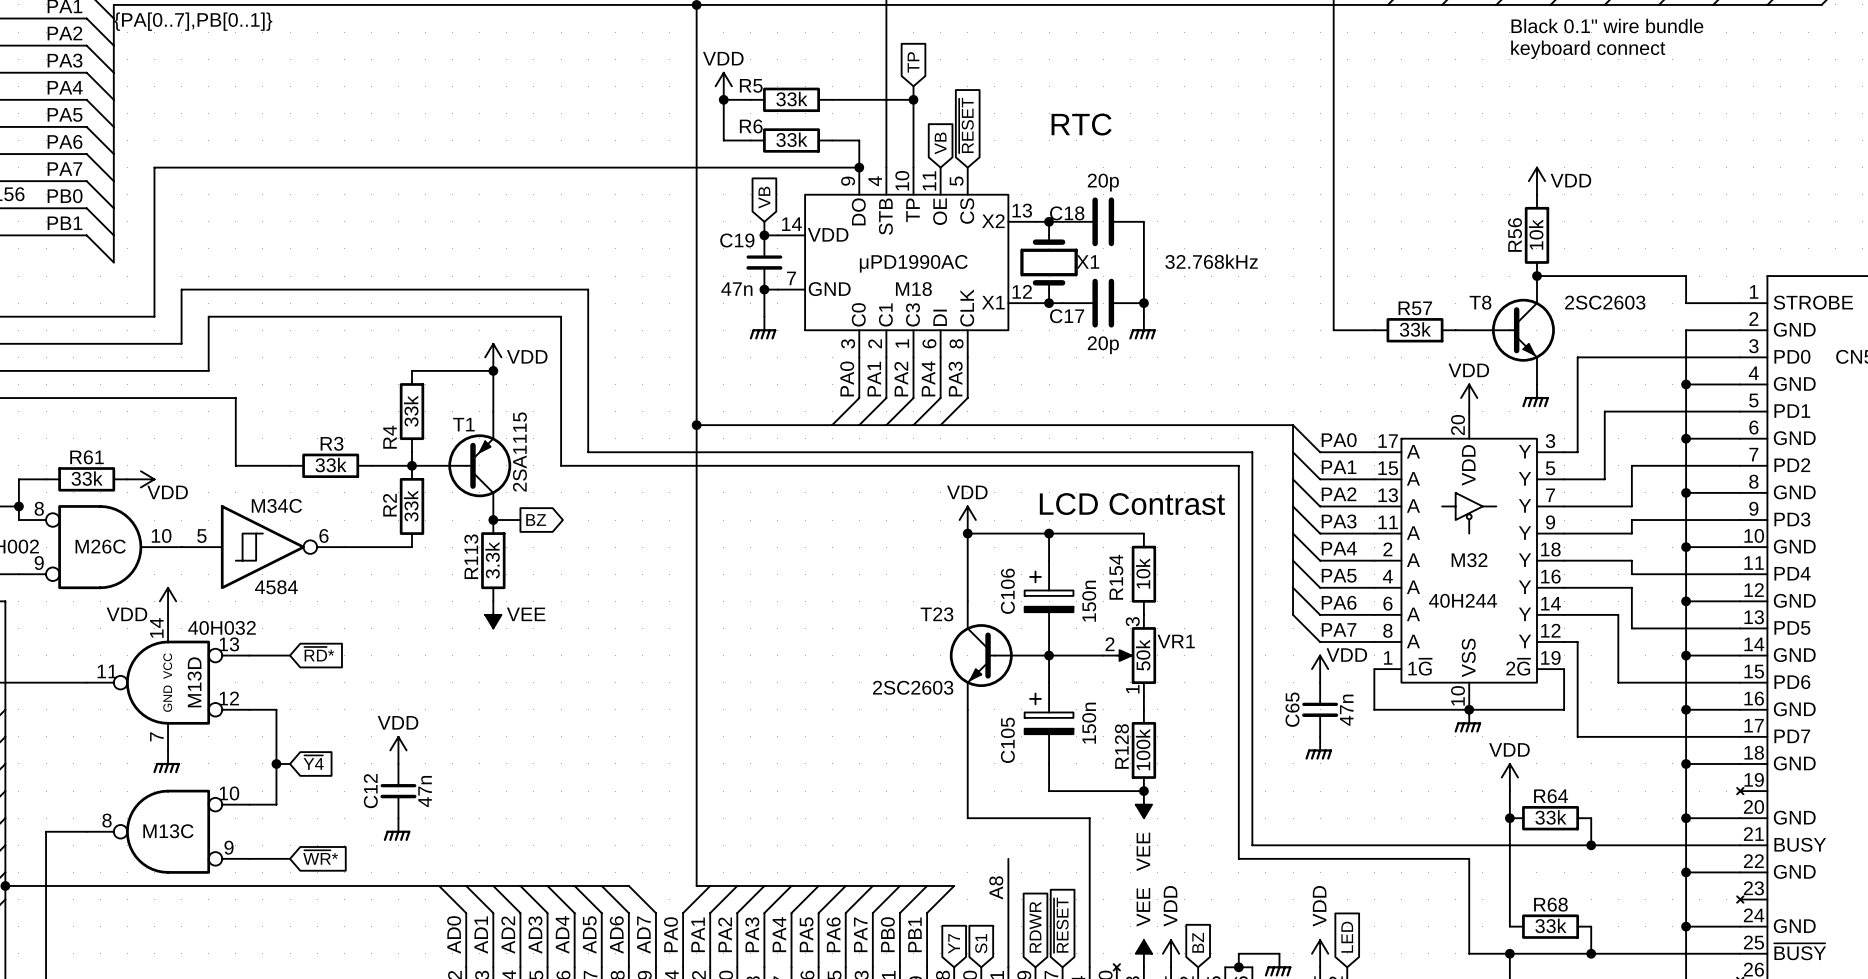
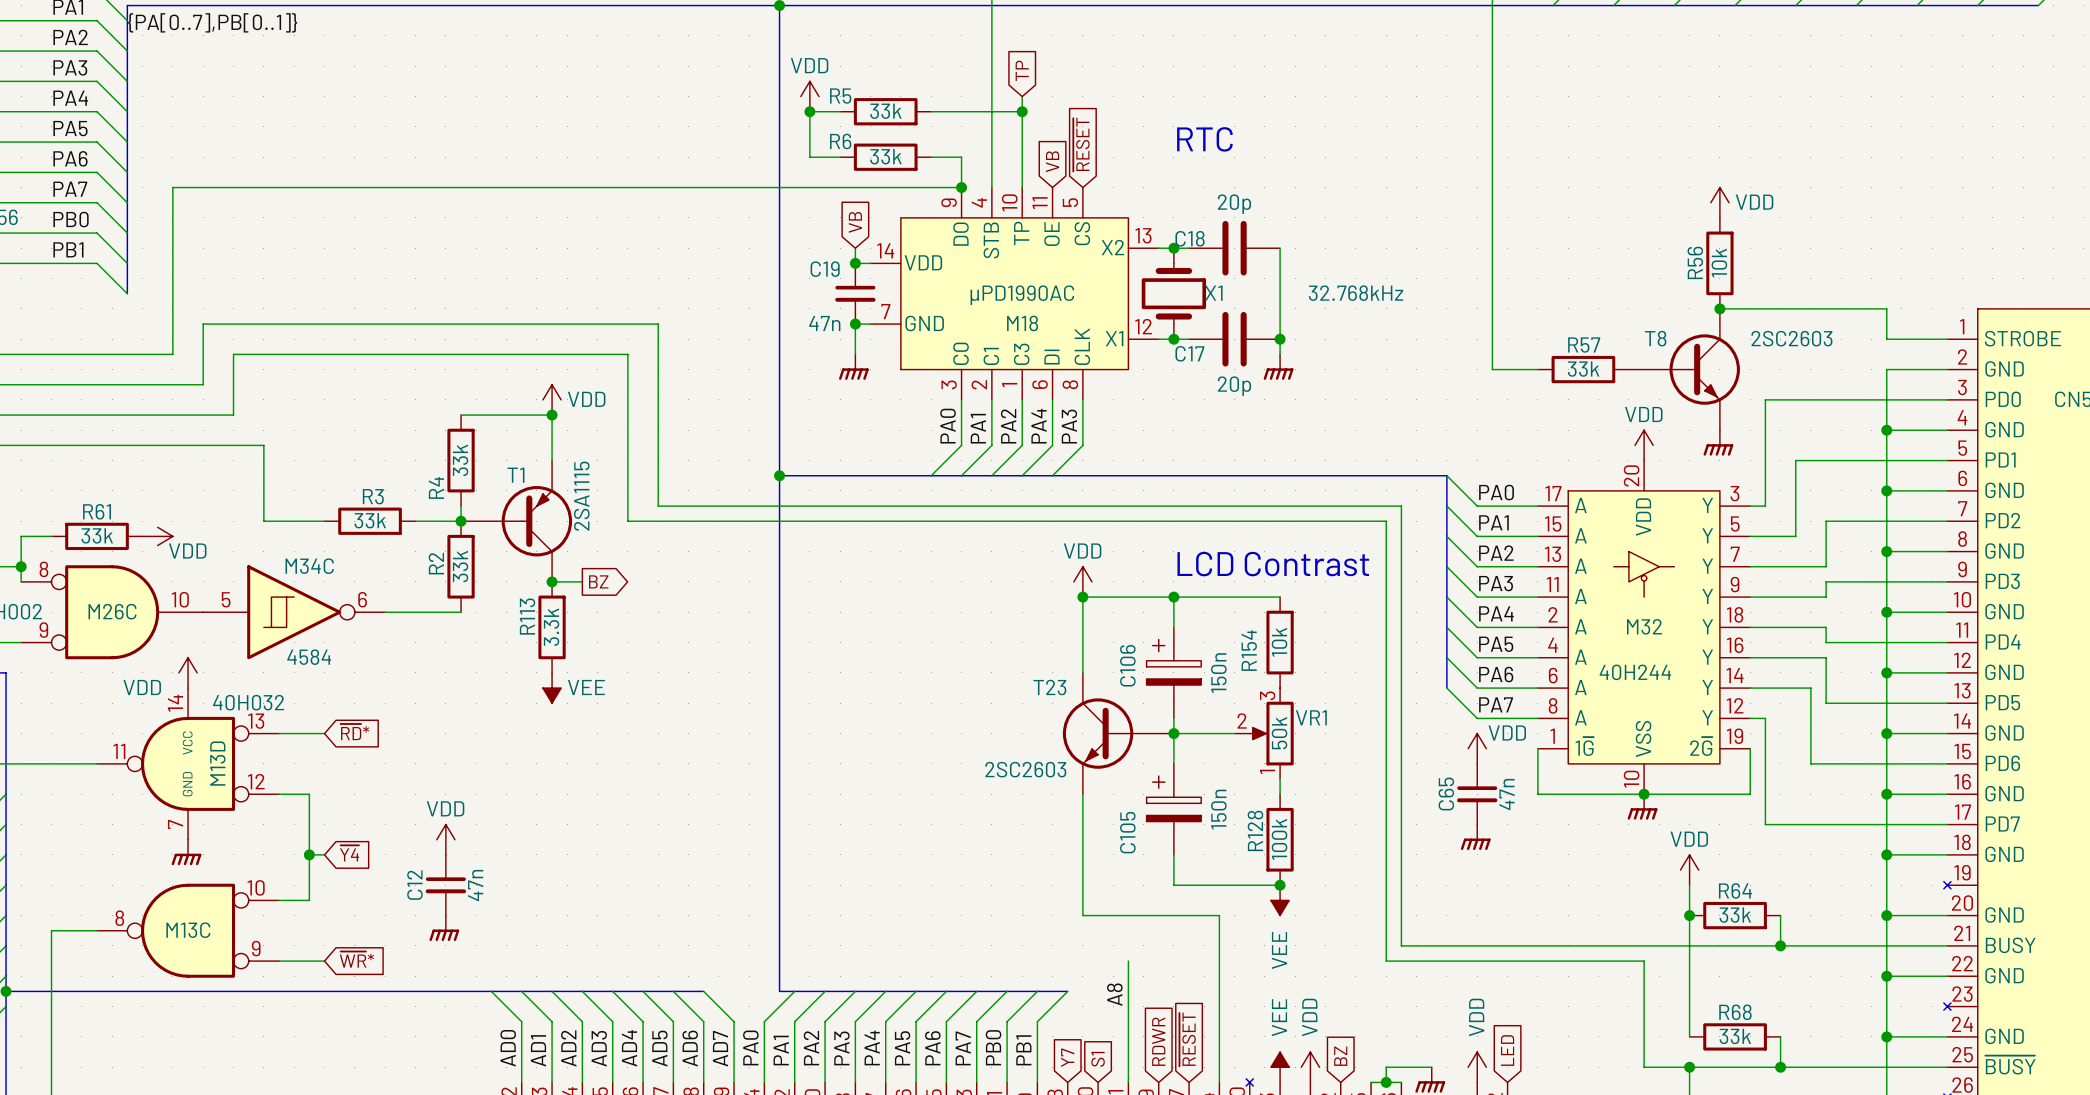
text: Black 0.1" wire bundle (1607, 25) -> none
text: keyboard connect (1588, 49) -> none

